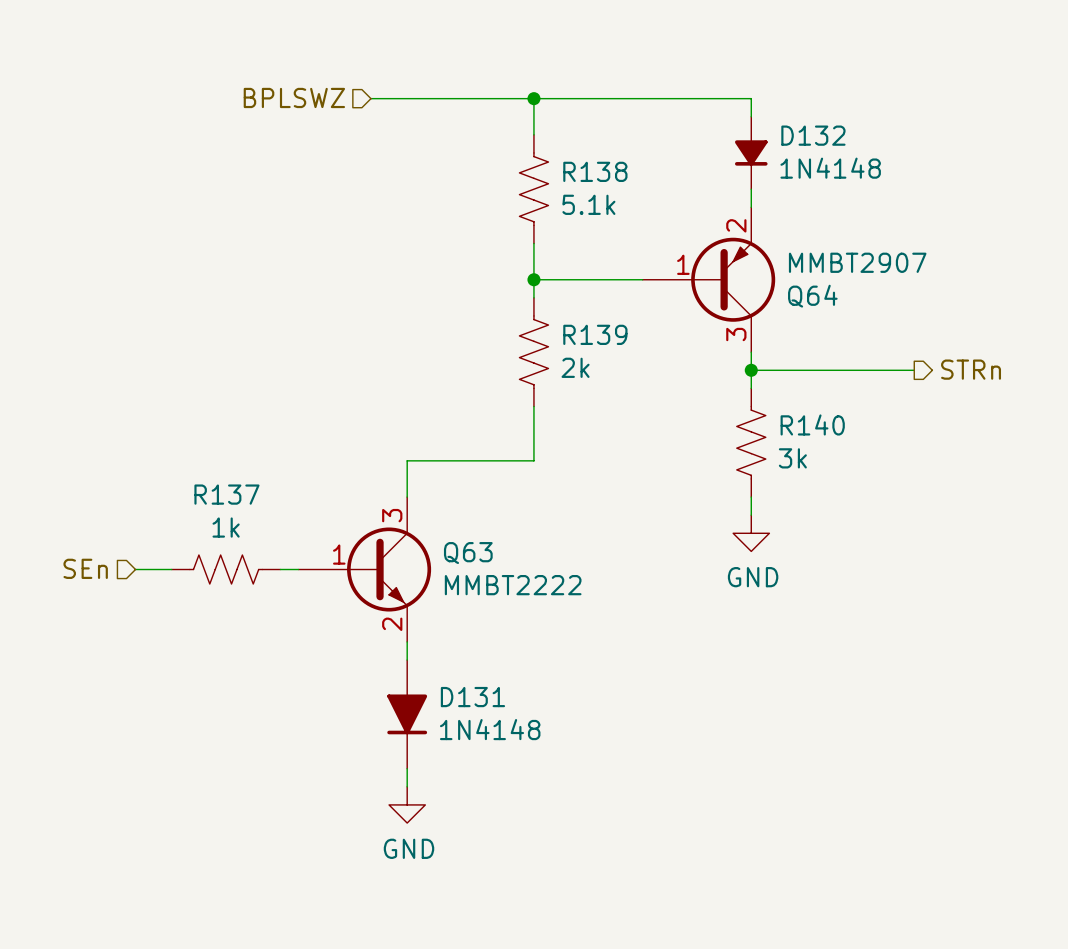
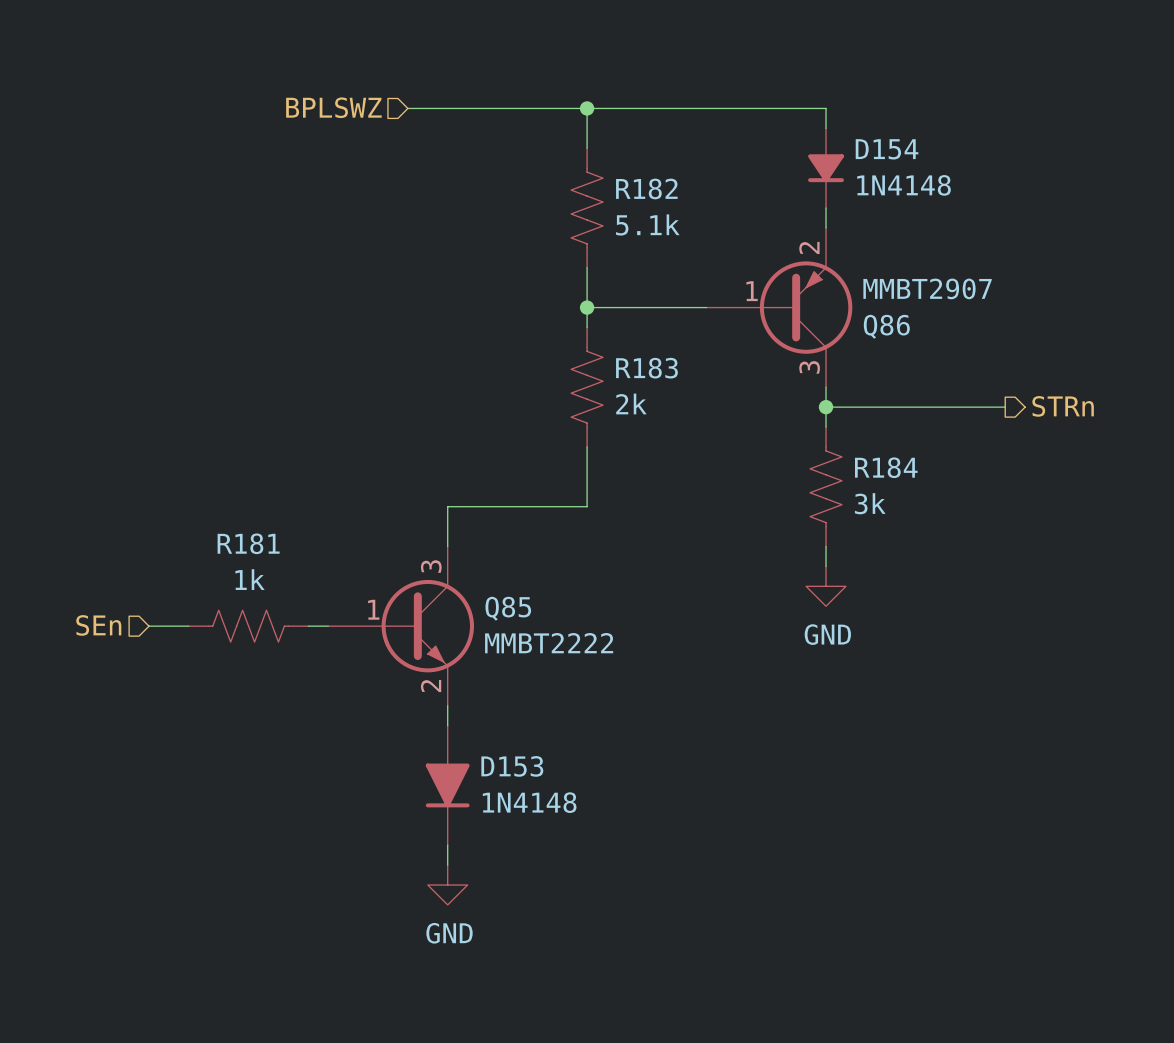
D132 name: D132 (813, 135) -> D154 (887, 149)
R138 name: R138 (595, 171) -> R182 (646, 188)
Q64 name: Q64 (812, 296) -> Q86 (886, 326)
R139 name: R139 (595, 334) -> R183 (646, 368)
R140 name: R140 (812, 424) -> R184 (886, 467)
R137 name: R137 (226, 494) -> R181 (248, 543)
Q63 name: Q63 (468, 553) -> Q85 (508, 608)
D131 name: D131 (472, 697) -> D153 (512, 766)

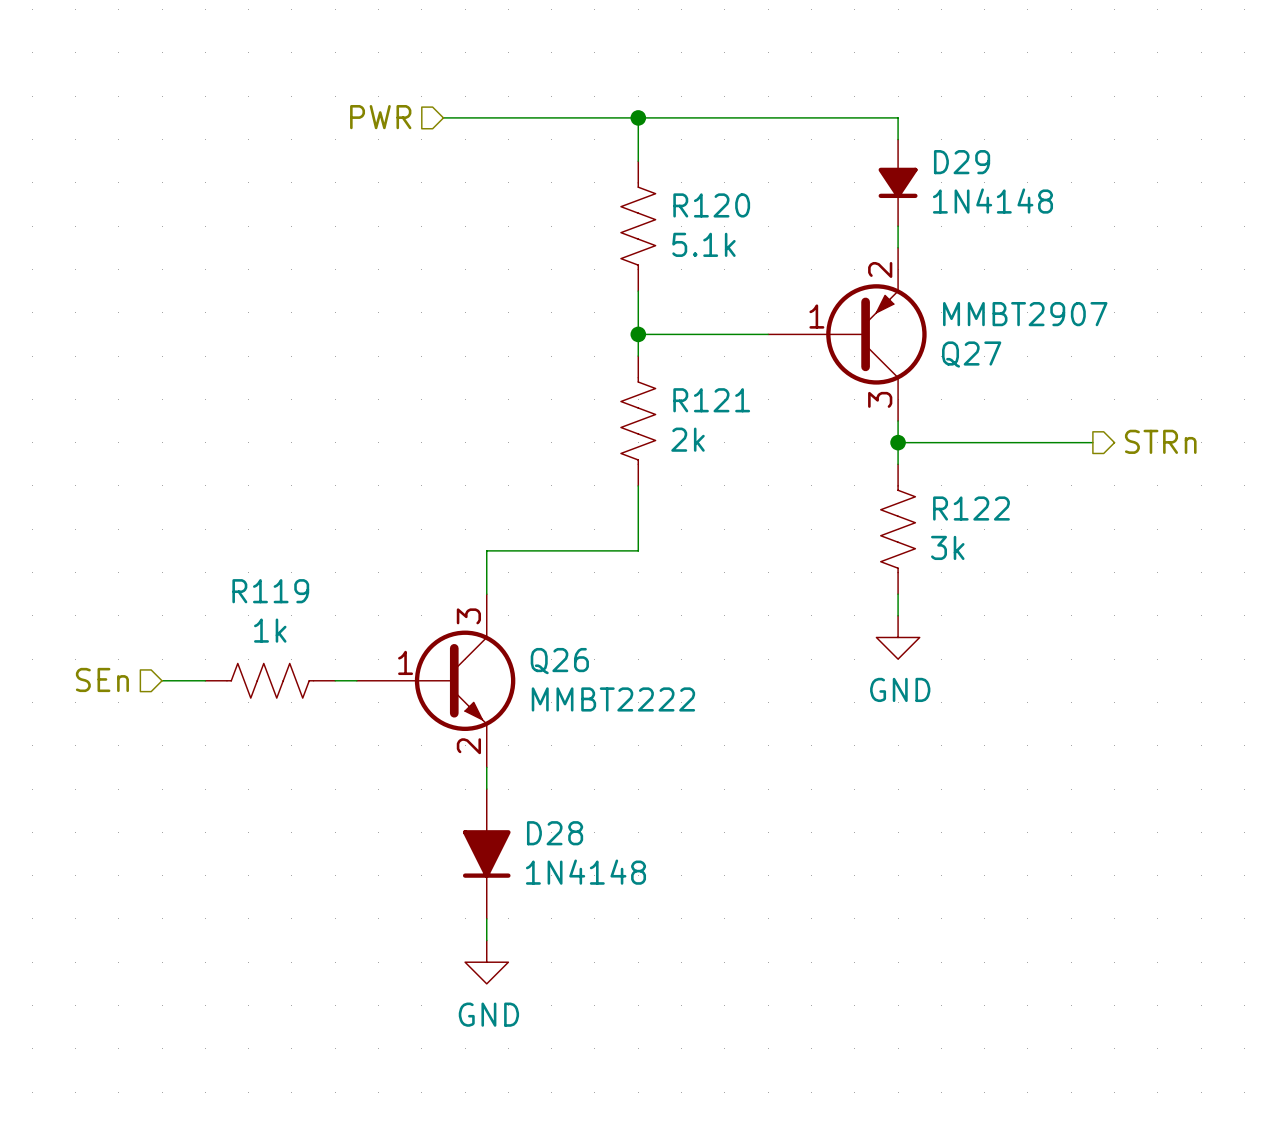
hierarchical label: BPLSWZ (333, 107) -> PWR (380, 117)
D154 name: D154 (887, 149) -> D29 (962, 162)
R182 name: R182 (646, 188) -> R120 (711, 205)
Q86 name: Q86 (886, 326) -> Q27 (971, 354)
R183 name: R183 (646, 368) -> R121 (711, 400)
R184 name: R184 (886, 467) -> R122 (971, 508)
R181 name: R181 (248, 543) -> R119 (270, 591)
Q85 name: Q85 (508, 608) -> Q26 (559, 661)
D153 name: D153 (512, 766) -> D28 (555, 833)

